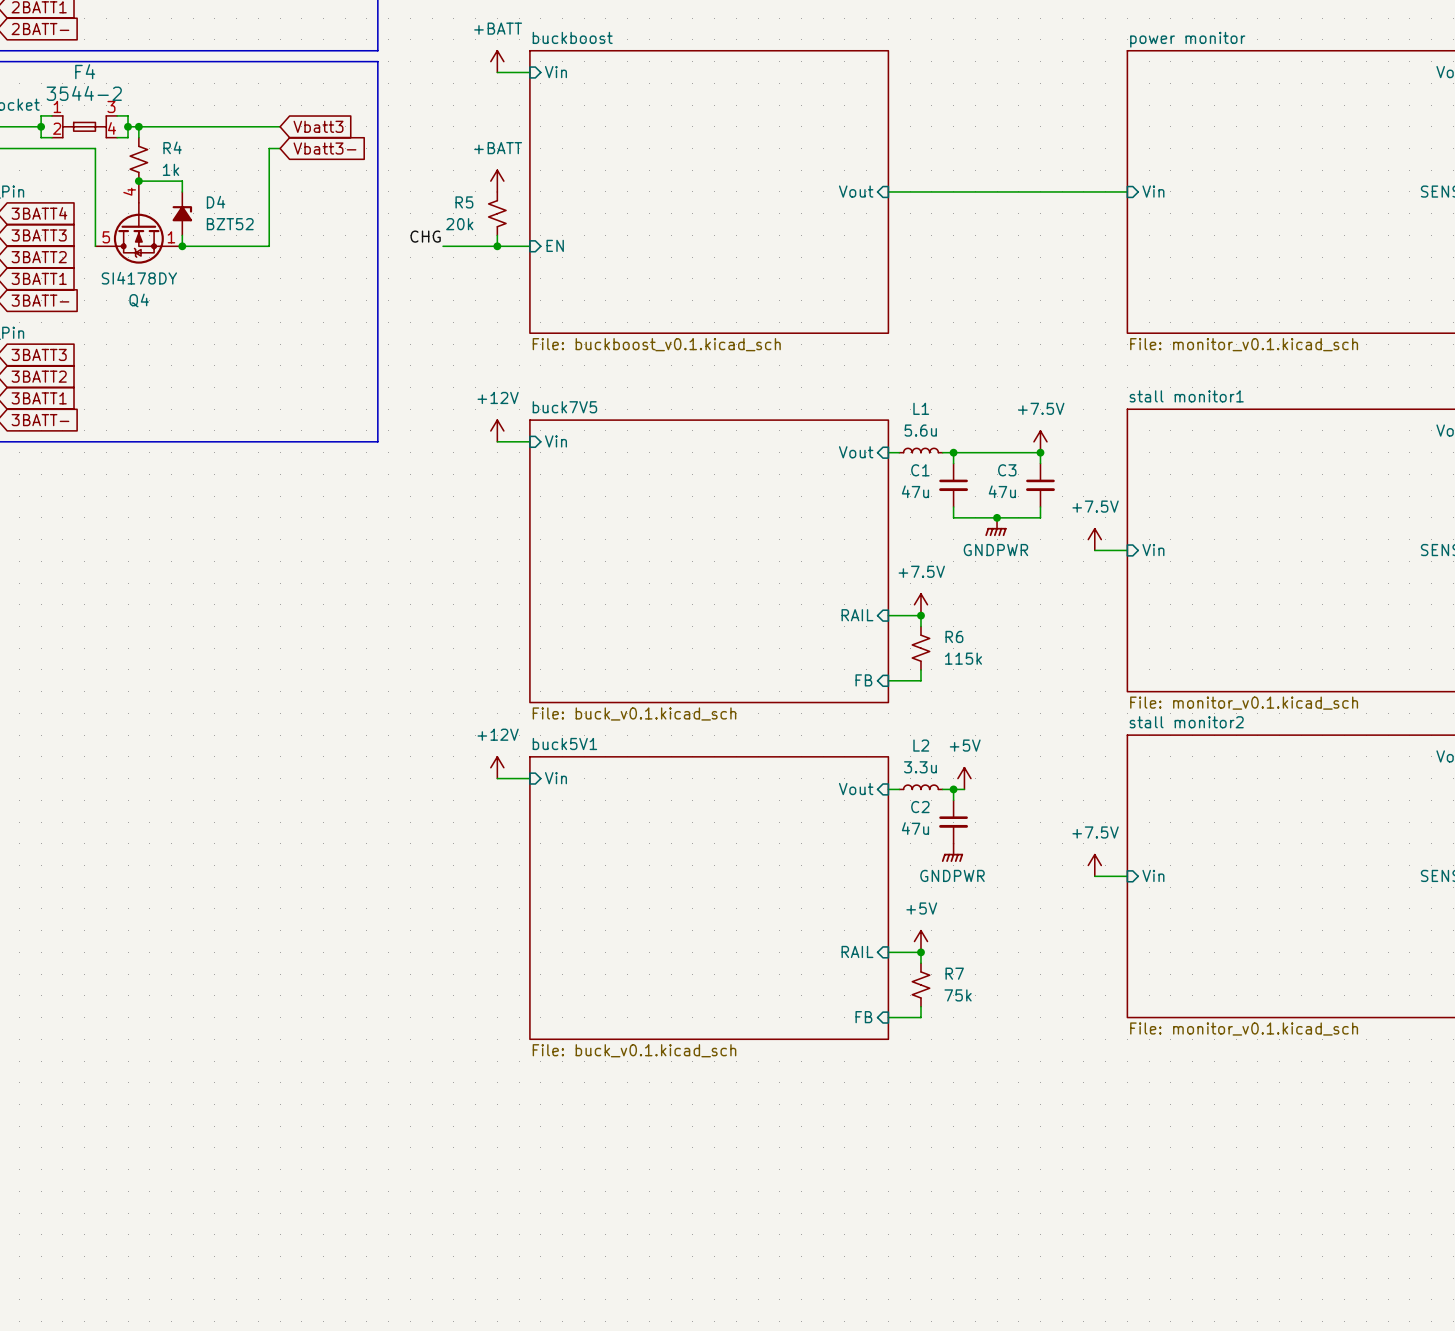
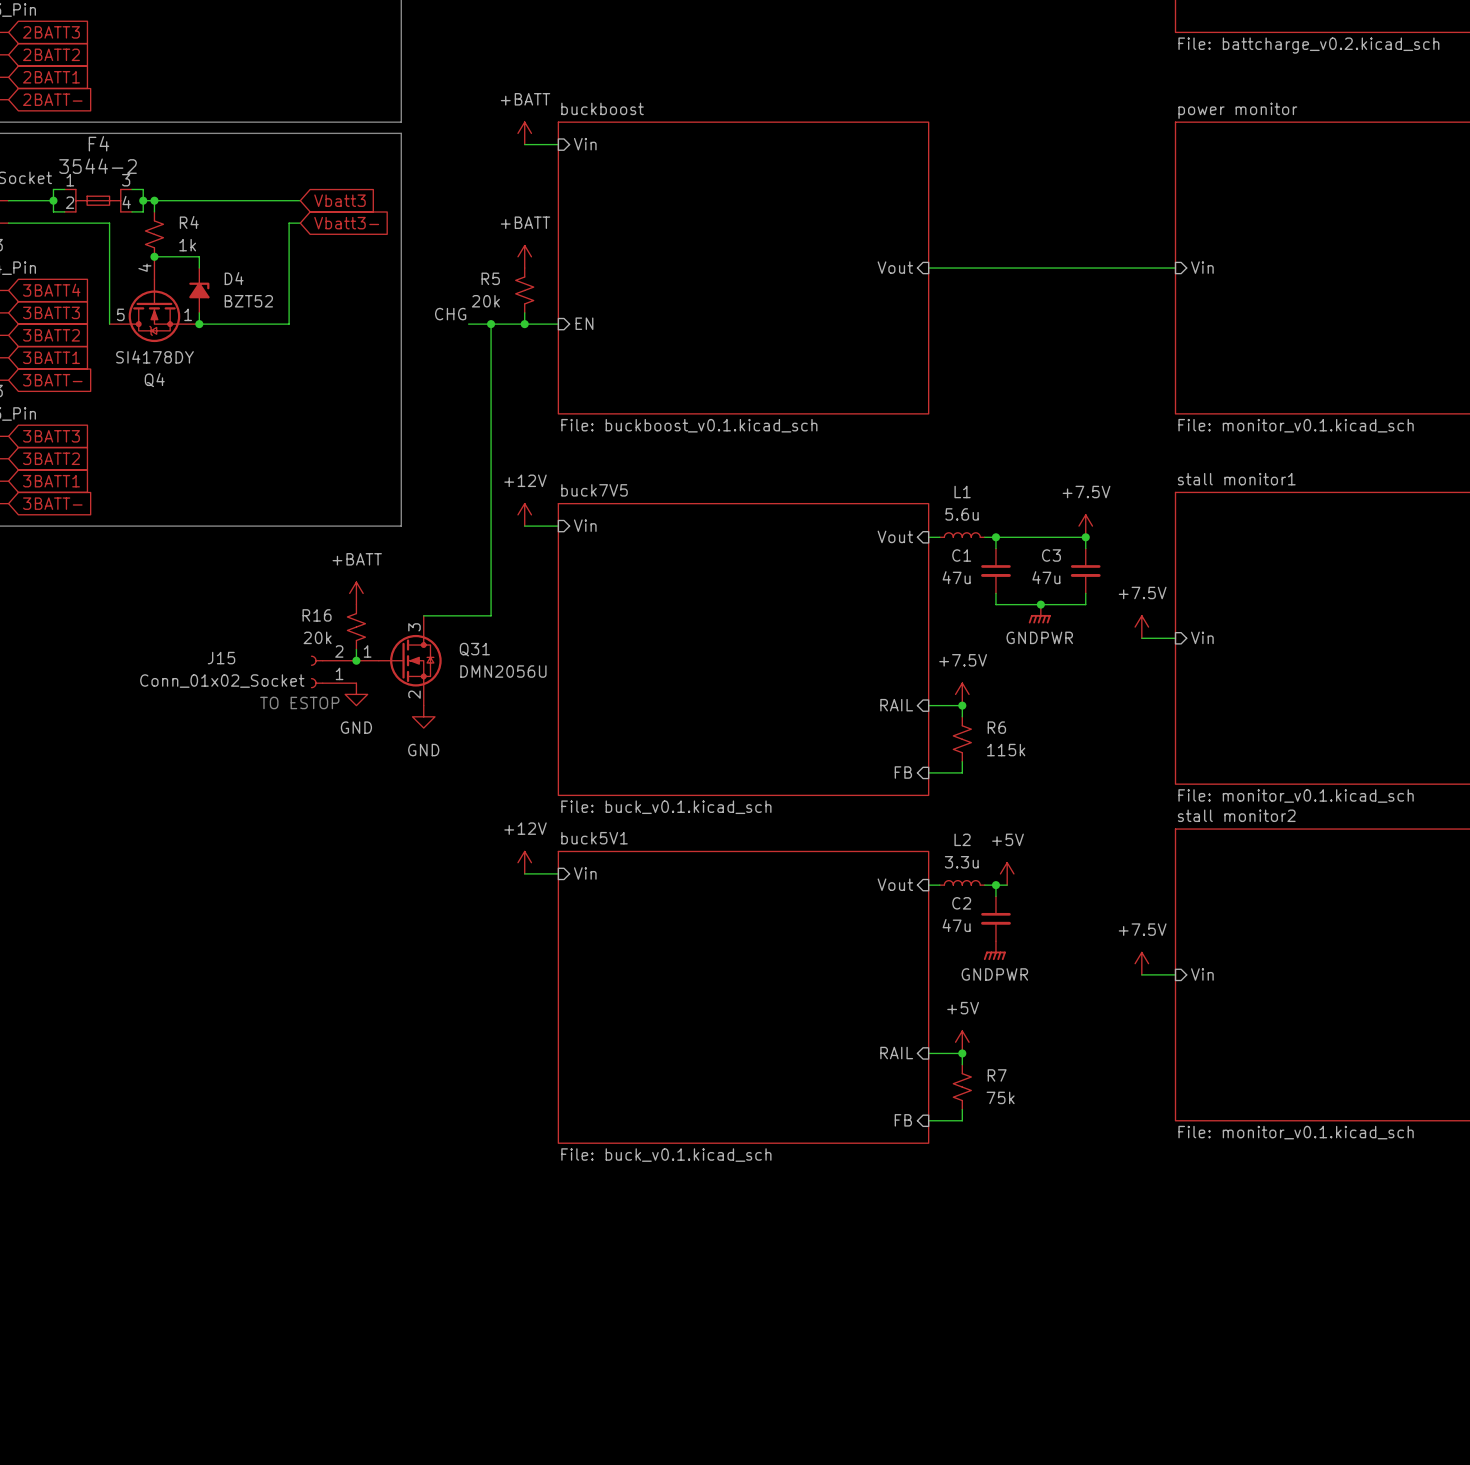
wire: none -> (491, 324) (491, 615) (423, 615)
junction: none -> (491, 324)
power symbol: none -> +BATT (356, 593)
R16: none -> 20k (356, 627)
wire: none -> (356, 649) (356, 660)
junction: none -> (356, 660)
Q31: none -> DMN2056U (399, 660)
J15: none -> Conn_01x02_Socket (333, 671)
power symbol: none -> GND (356, 694)
text: none -> TO ESTOP (299, 702)
power symbol: none -> GND (423, 716)

